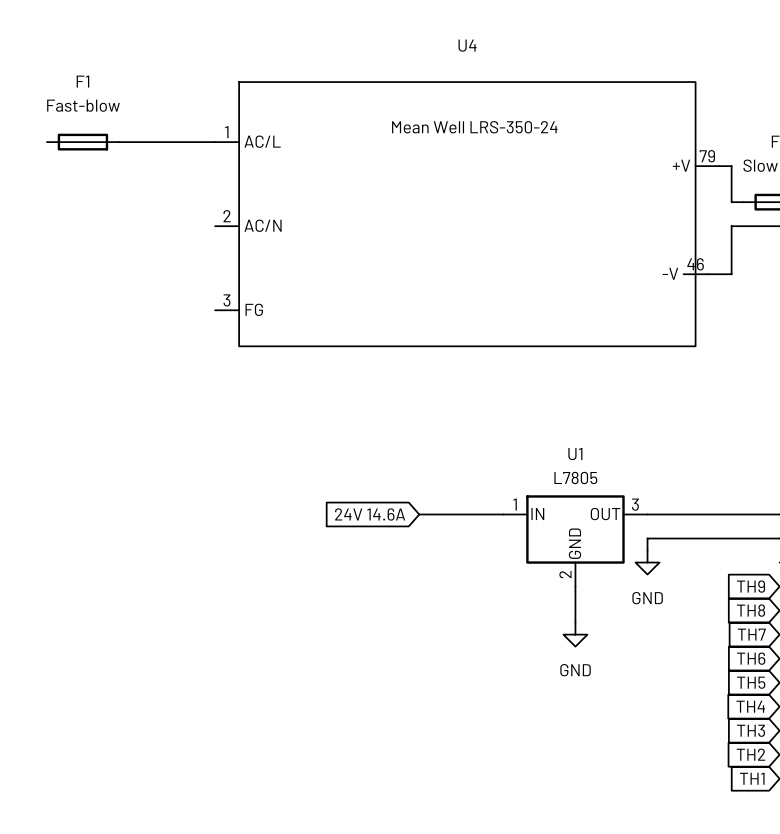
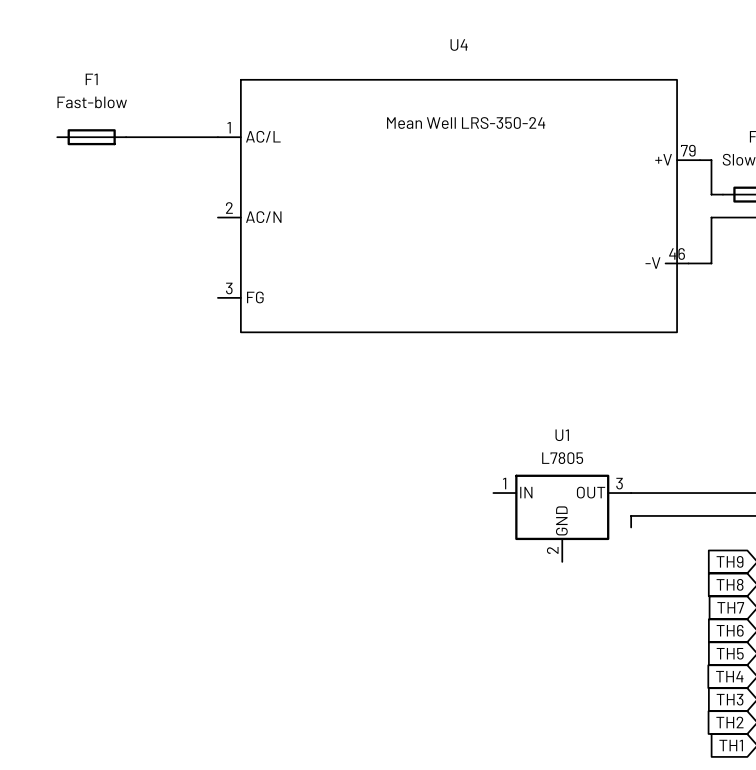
global label: 24V 14.6A (370, 514) -> none
wire: (419, 514) (503, 514) -> none
power symbol: GND (647, 562) -> none
wire: (575, 586) (575, 622) -> none
power symbol: GND (575, 634) -> none

